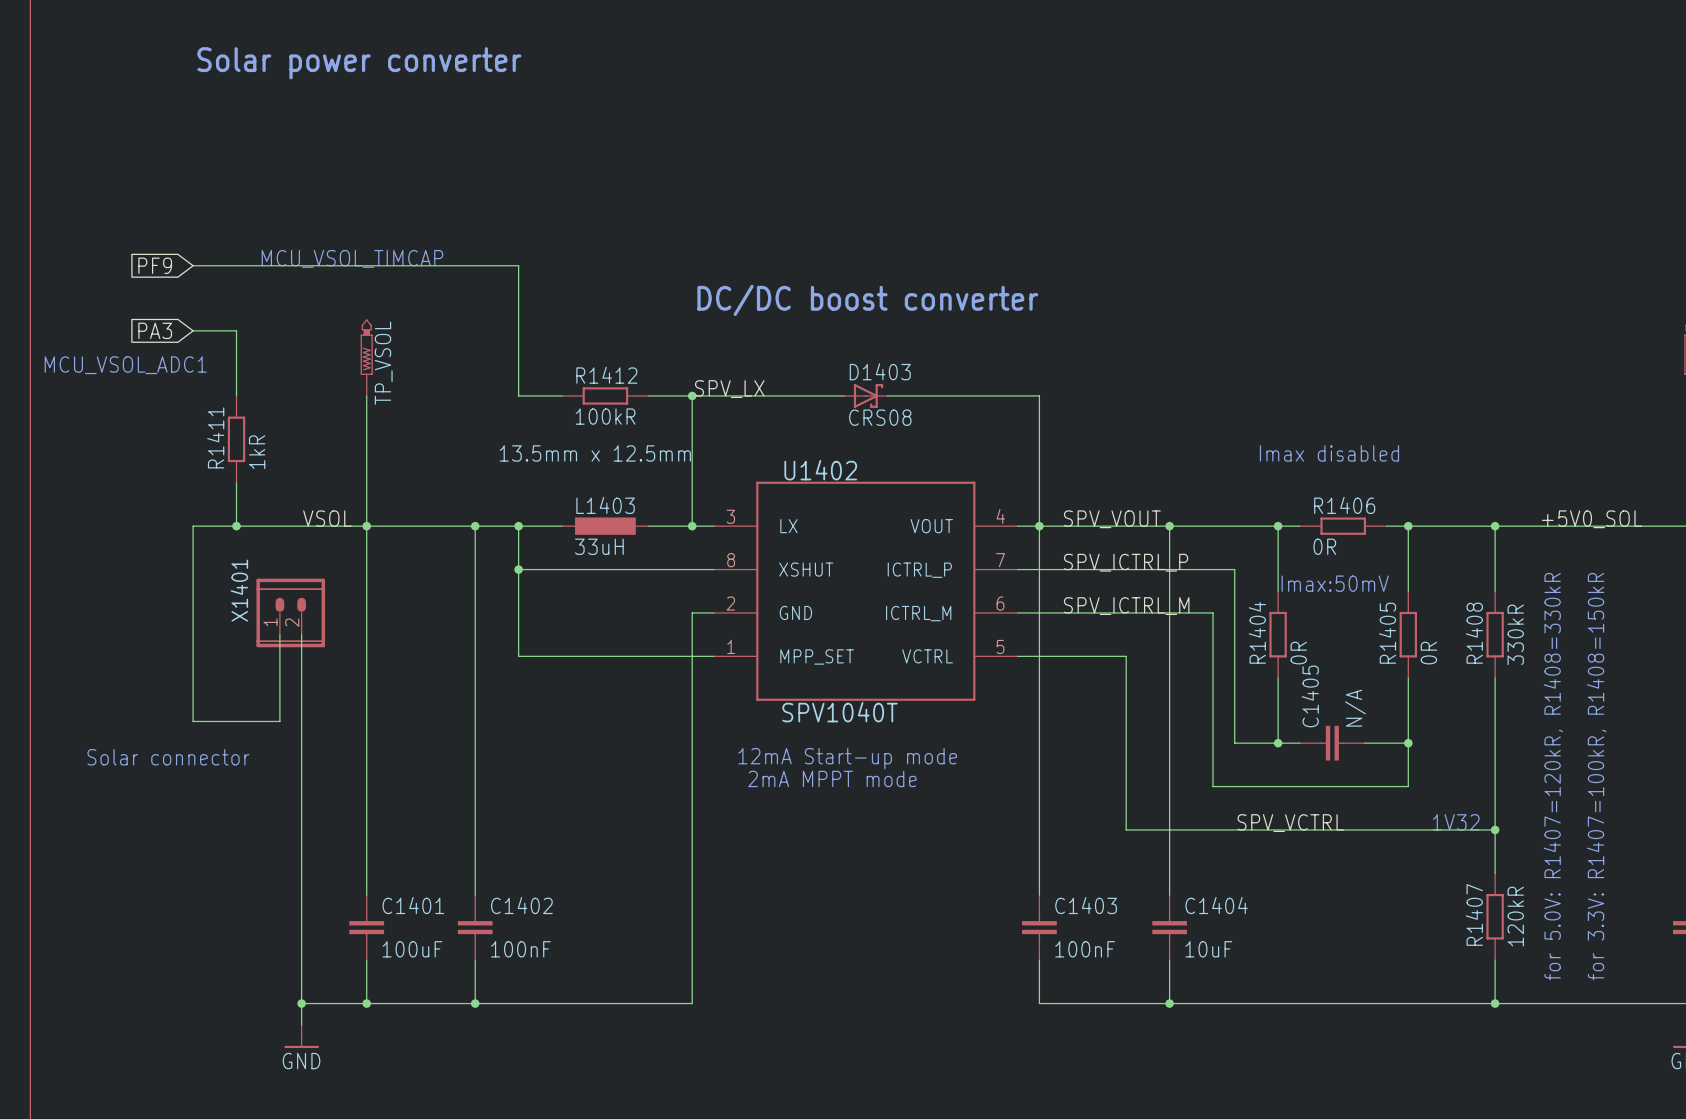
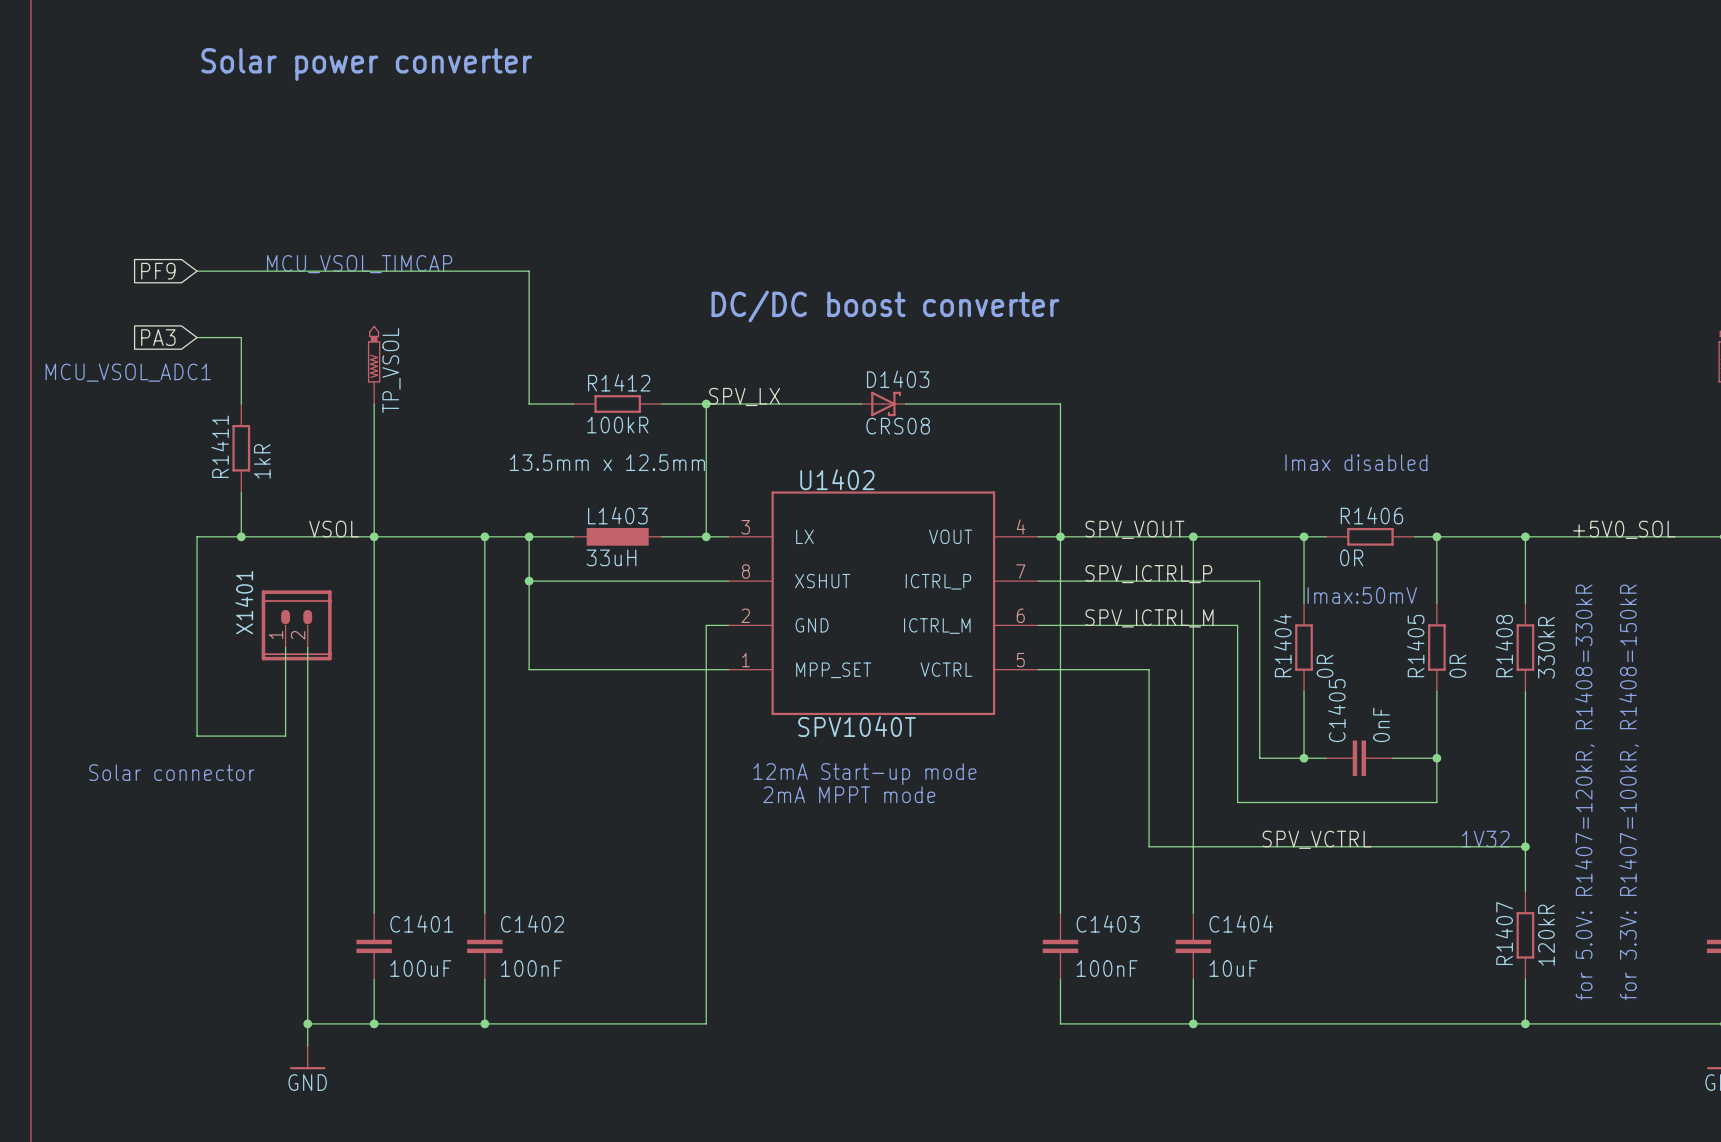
C1405 value: N/A (1355, 708) -> 0nF (1381, 724)

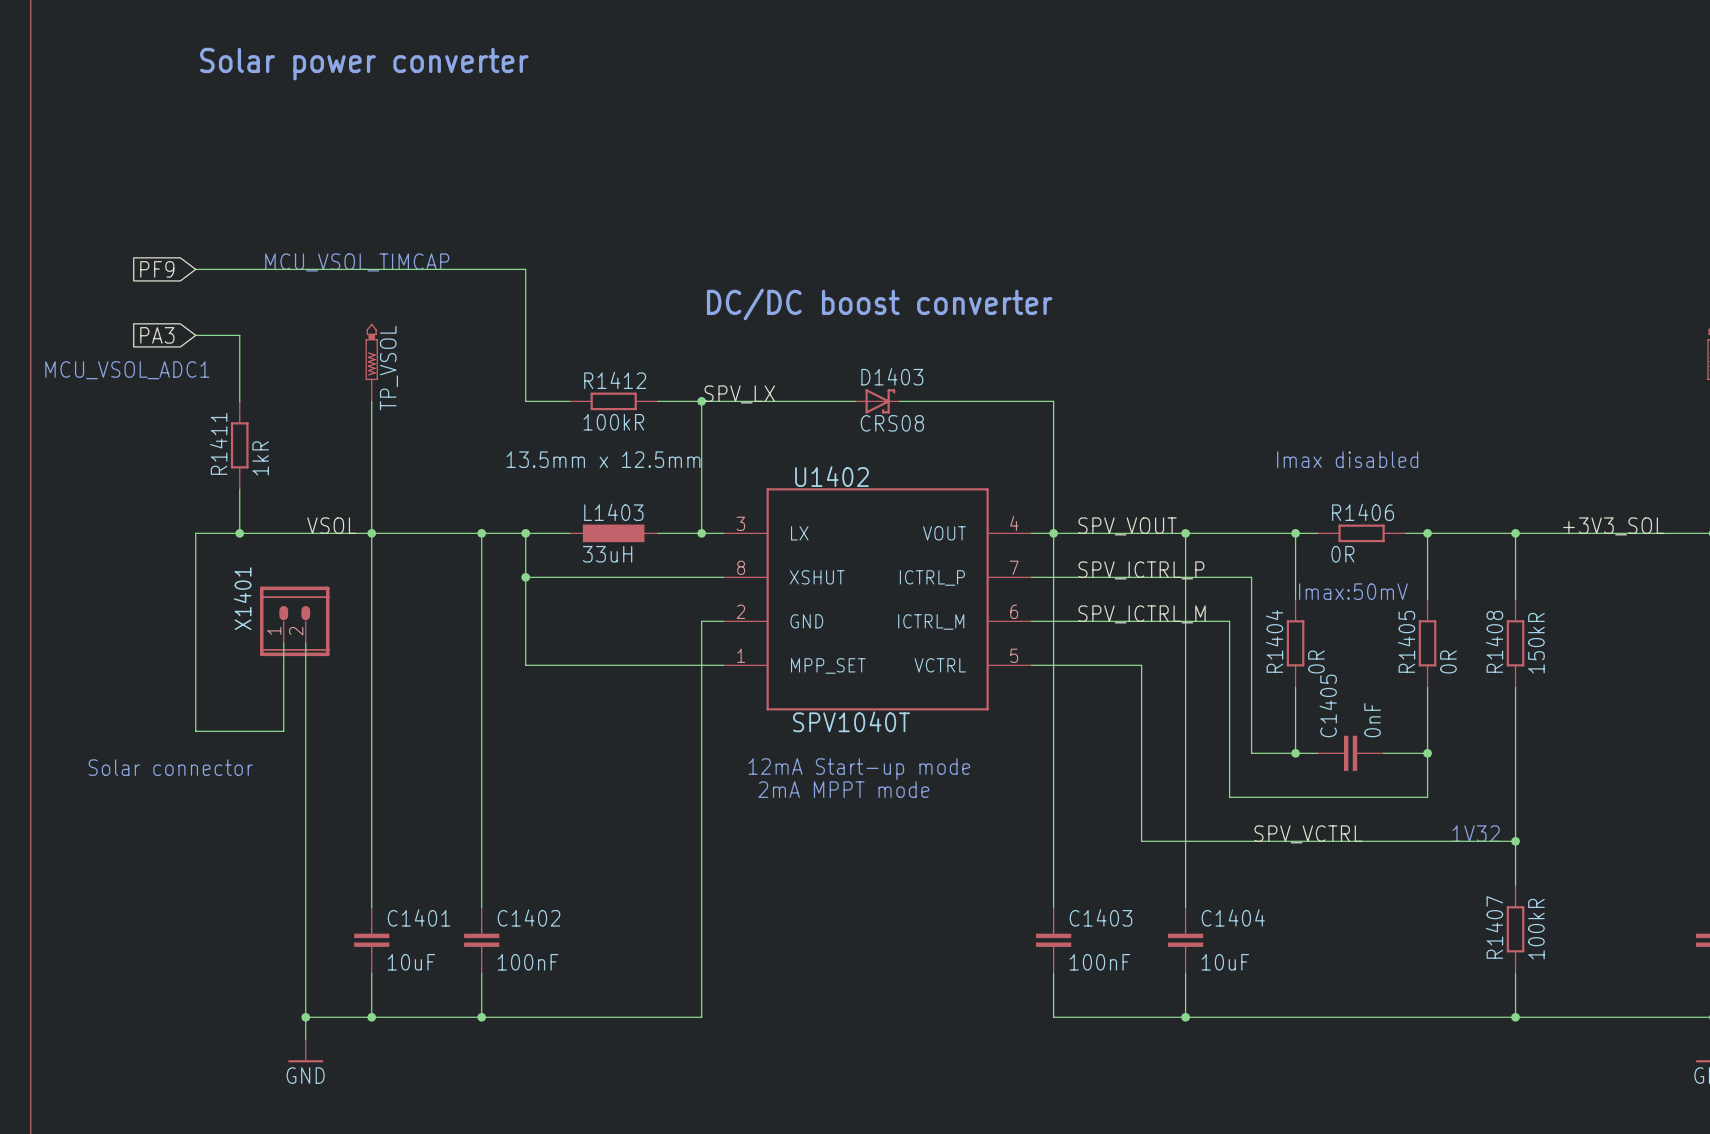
label: +5V0_SOL (1624, 529) -> +3V3_SOL (1613, 526)
R1408 value: 330kR (1546, 647) -> 150kR (1536, 643)
text: for 5.0V: R1407=120kR, R1408=330kR (1584, 792) -> none
text: for 3.3V: R1407=100kR, R1408=150kR (1629, 792) -> none
R1407 value: 120kR (1546, 935) -> 100kR (1536, 929)
C1401 value: 100uF (420, 968) -> 10uF (411, 962)

